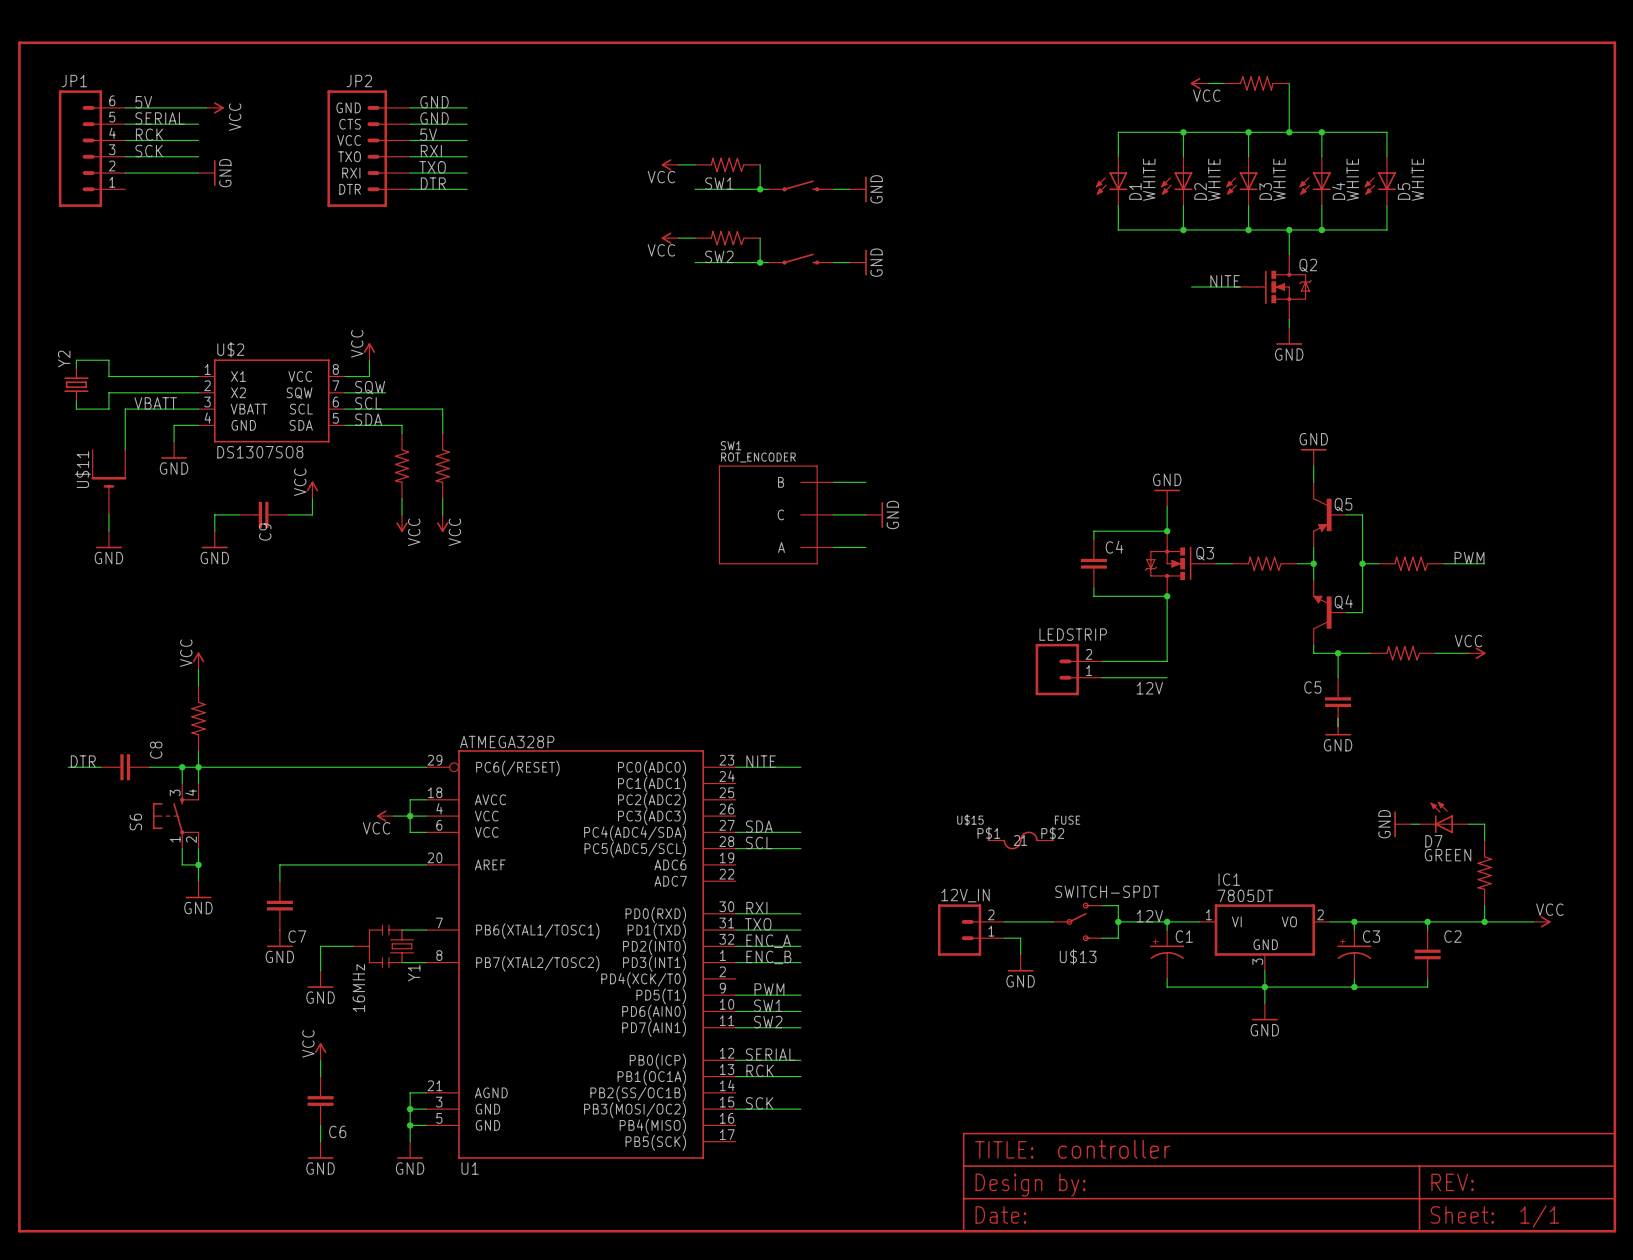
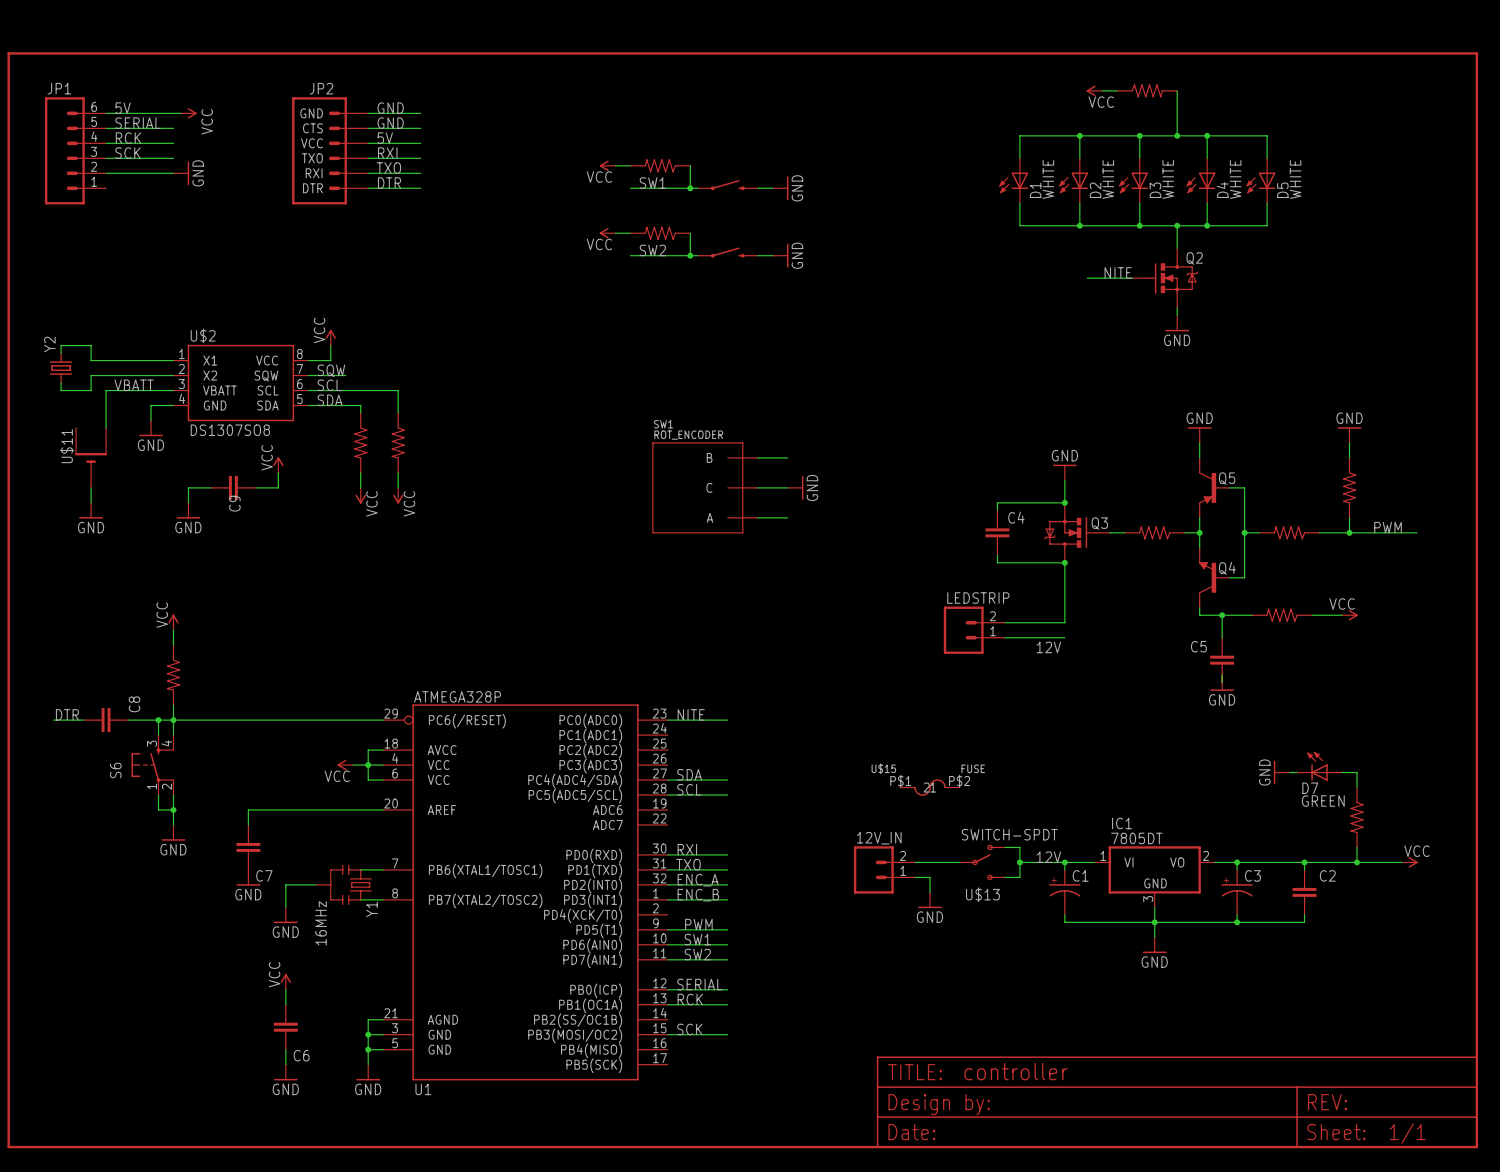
power symbol: none -> GND (1349, 435)
wire: none -> (1349, 442) (1349, 457)
part: none -> (1349, 487)
wire: none -> (1349, 517) (1349, 532)
label position: PWM (1469, 558) -> PWM (1388, 527)
junction: none -> (1349, 532)
wire: none -> (1356, 532) (1416, 532)

